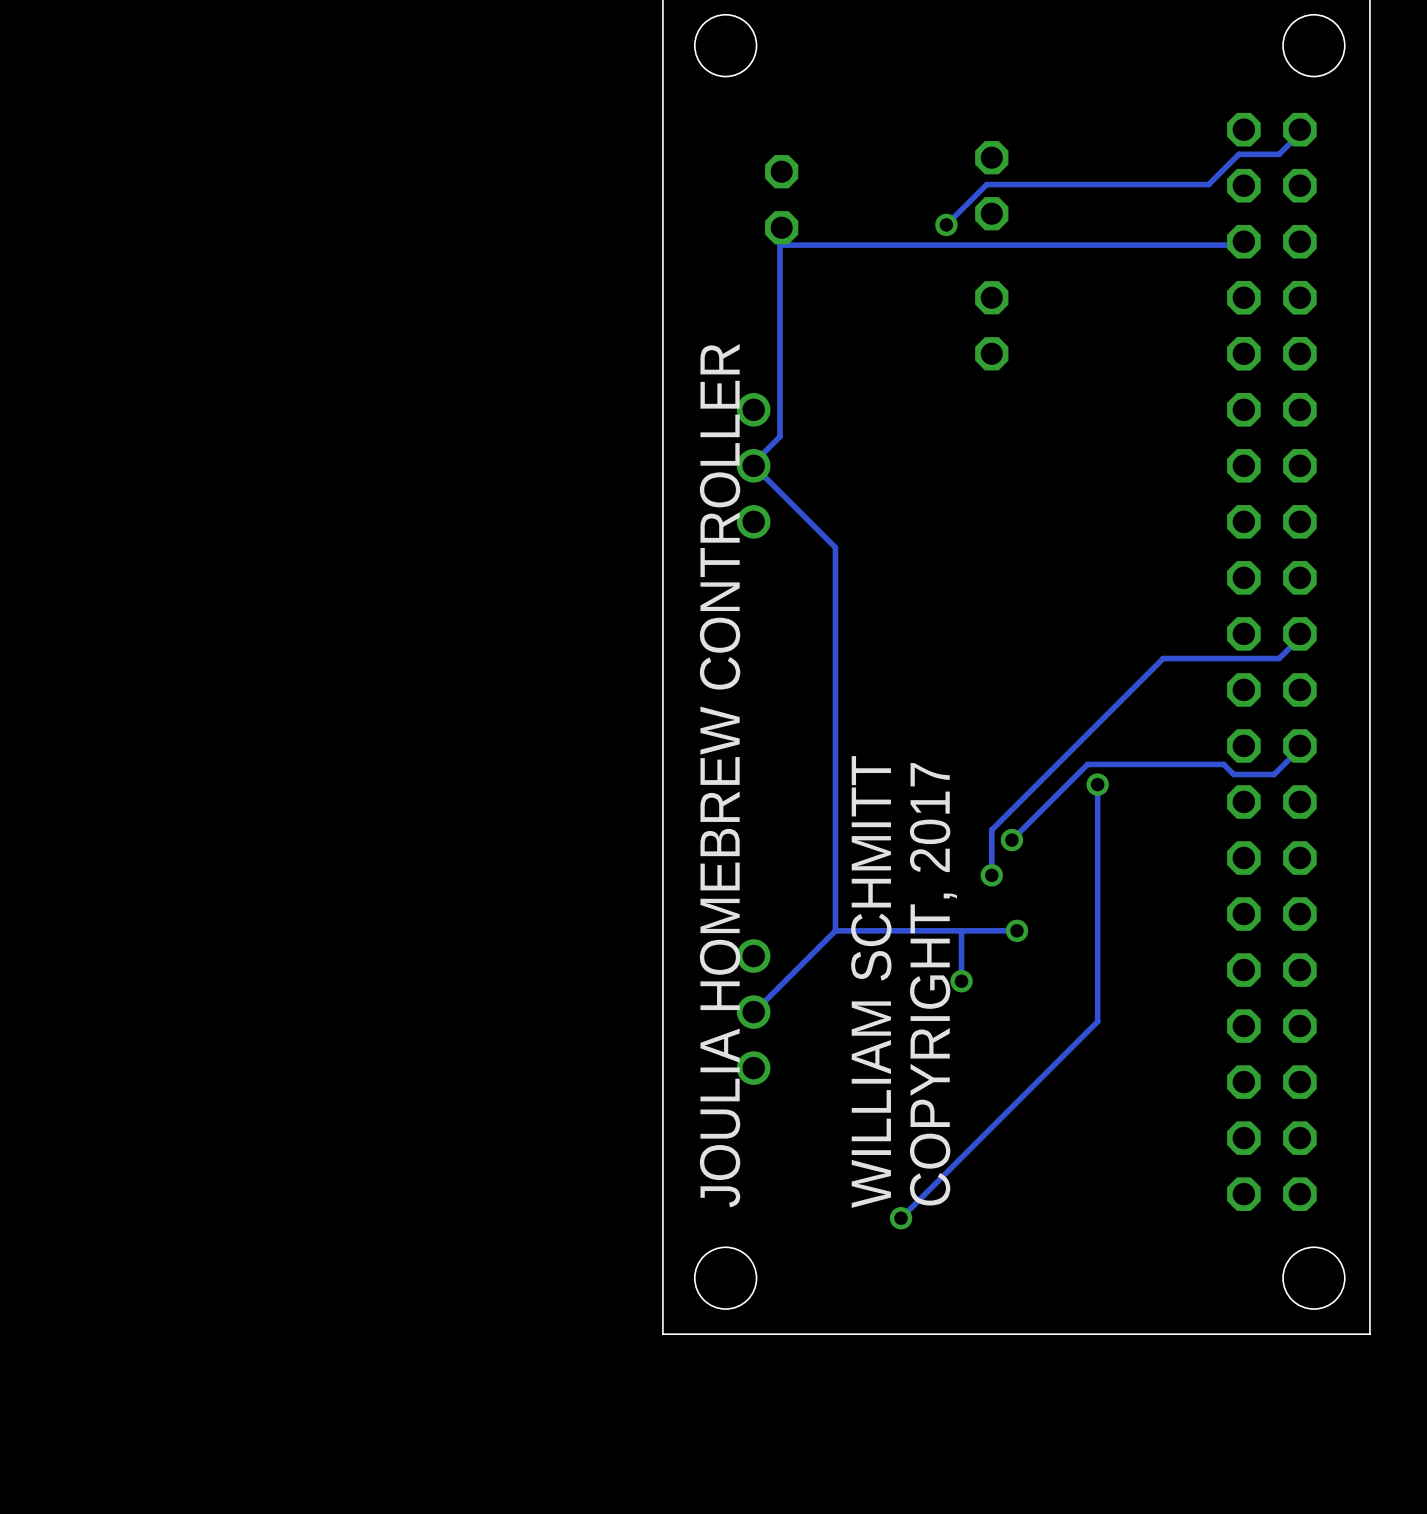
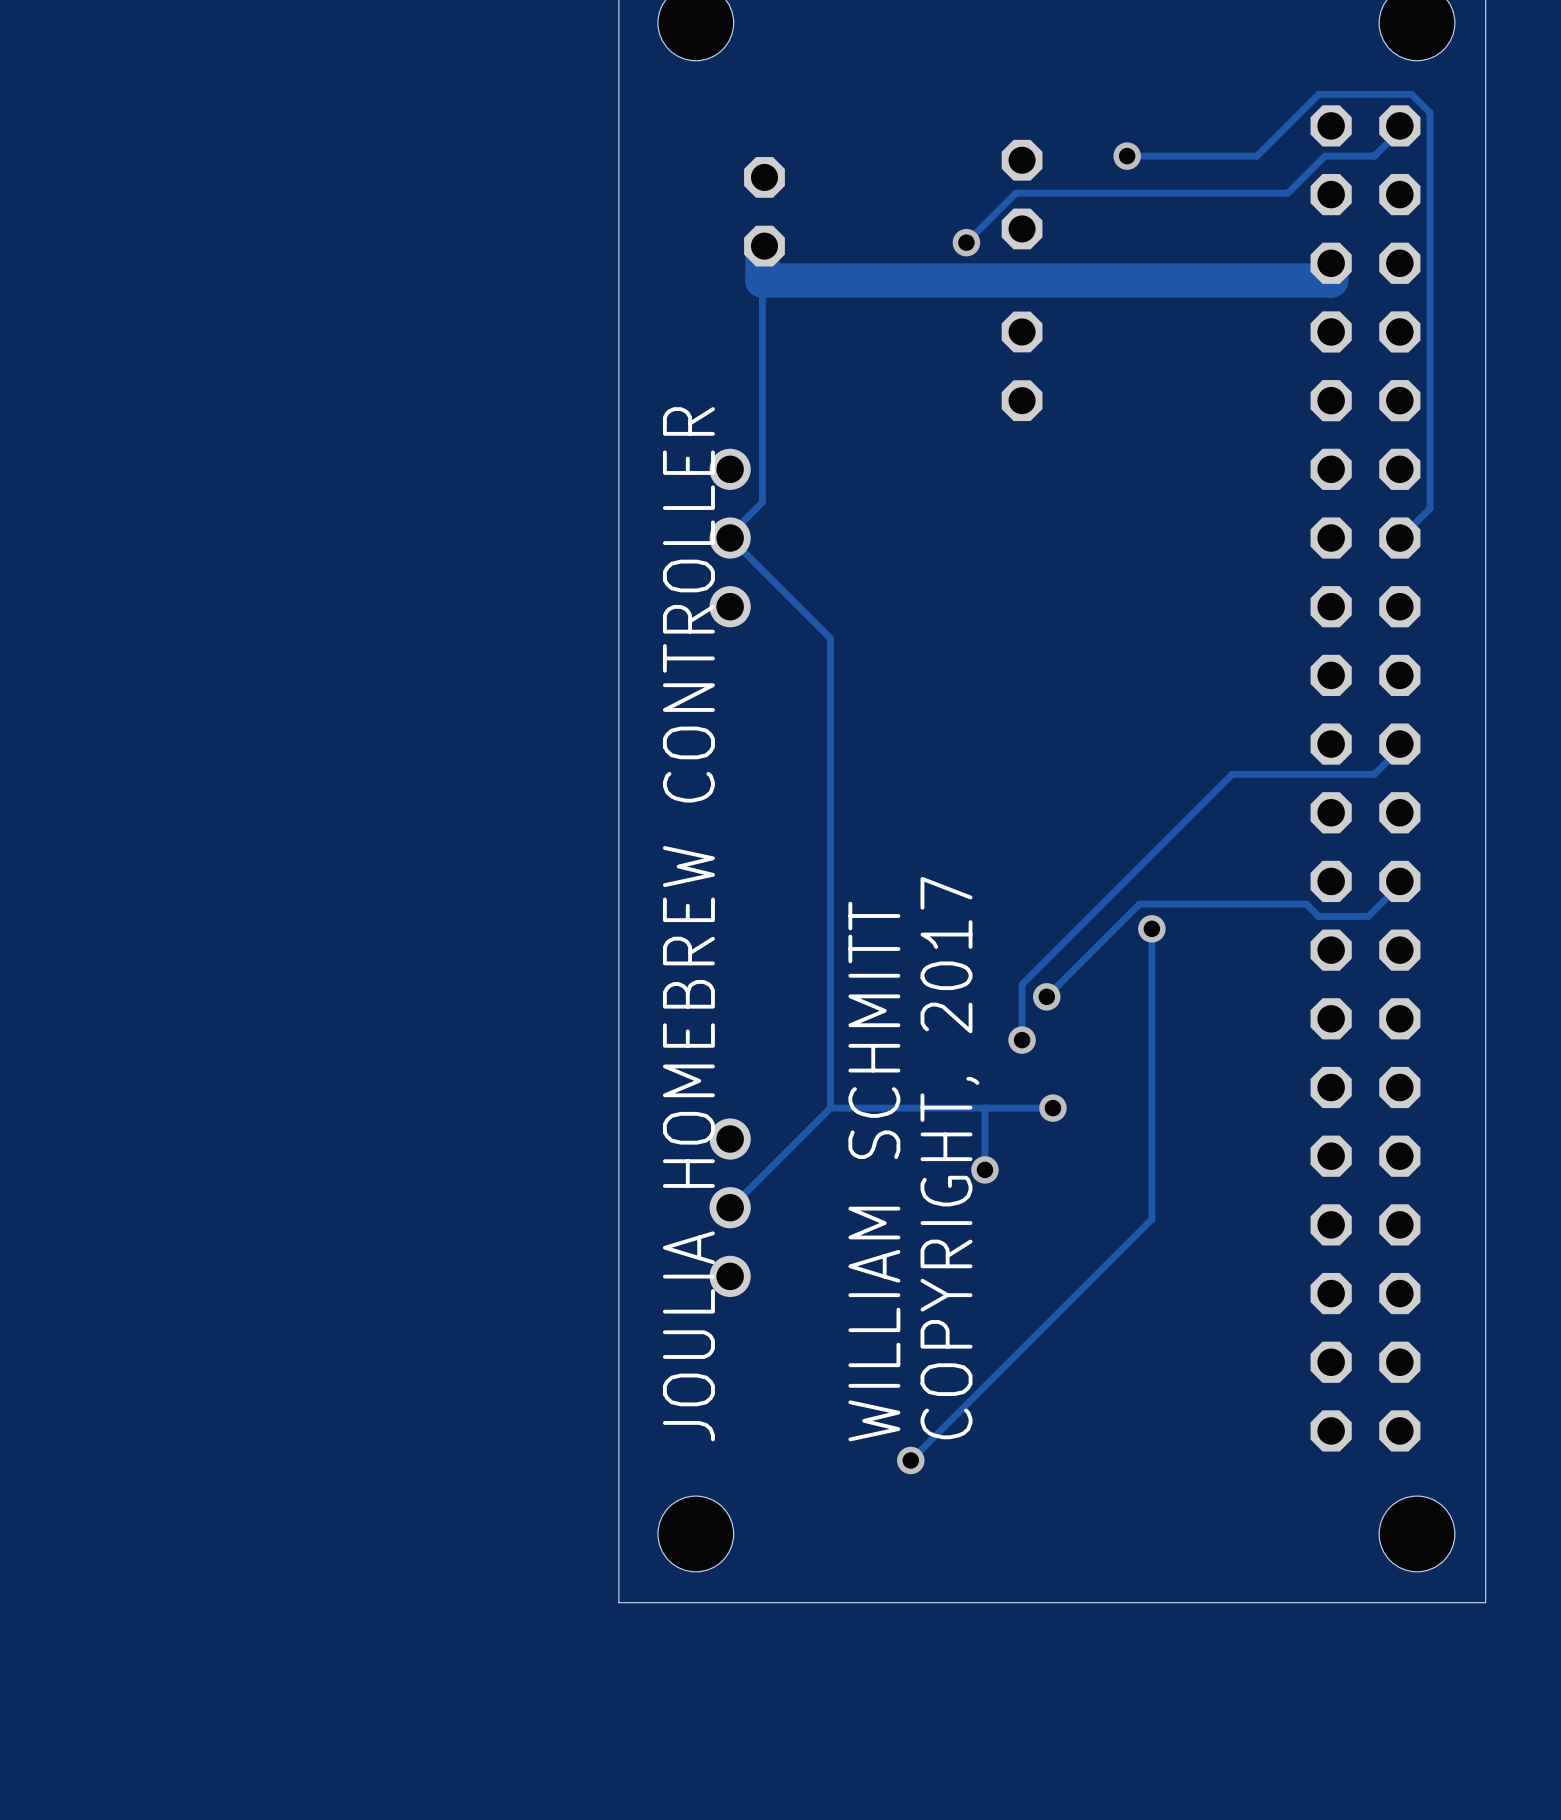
track: none -> (1127, 156) (1256, 156) (1318, 94) (1411, 94) (1430, 112) (1430, 508) (1399, 538)
via: none -> (1127, 156)
track: none -> (764, 246) (762, 246) (762, 280) (1331, 280) (1331, 263)
track: (1243, 245) (780, 245) -> none

